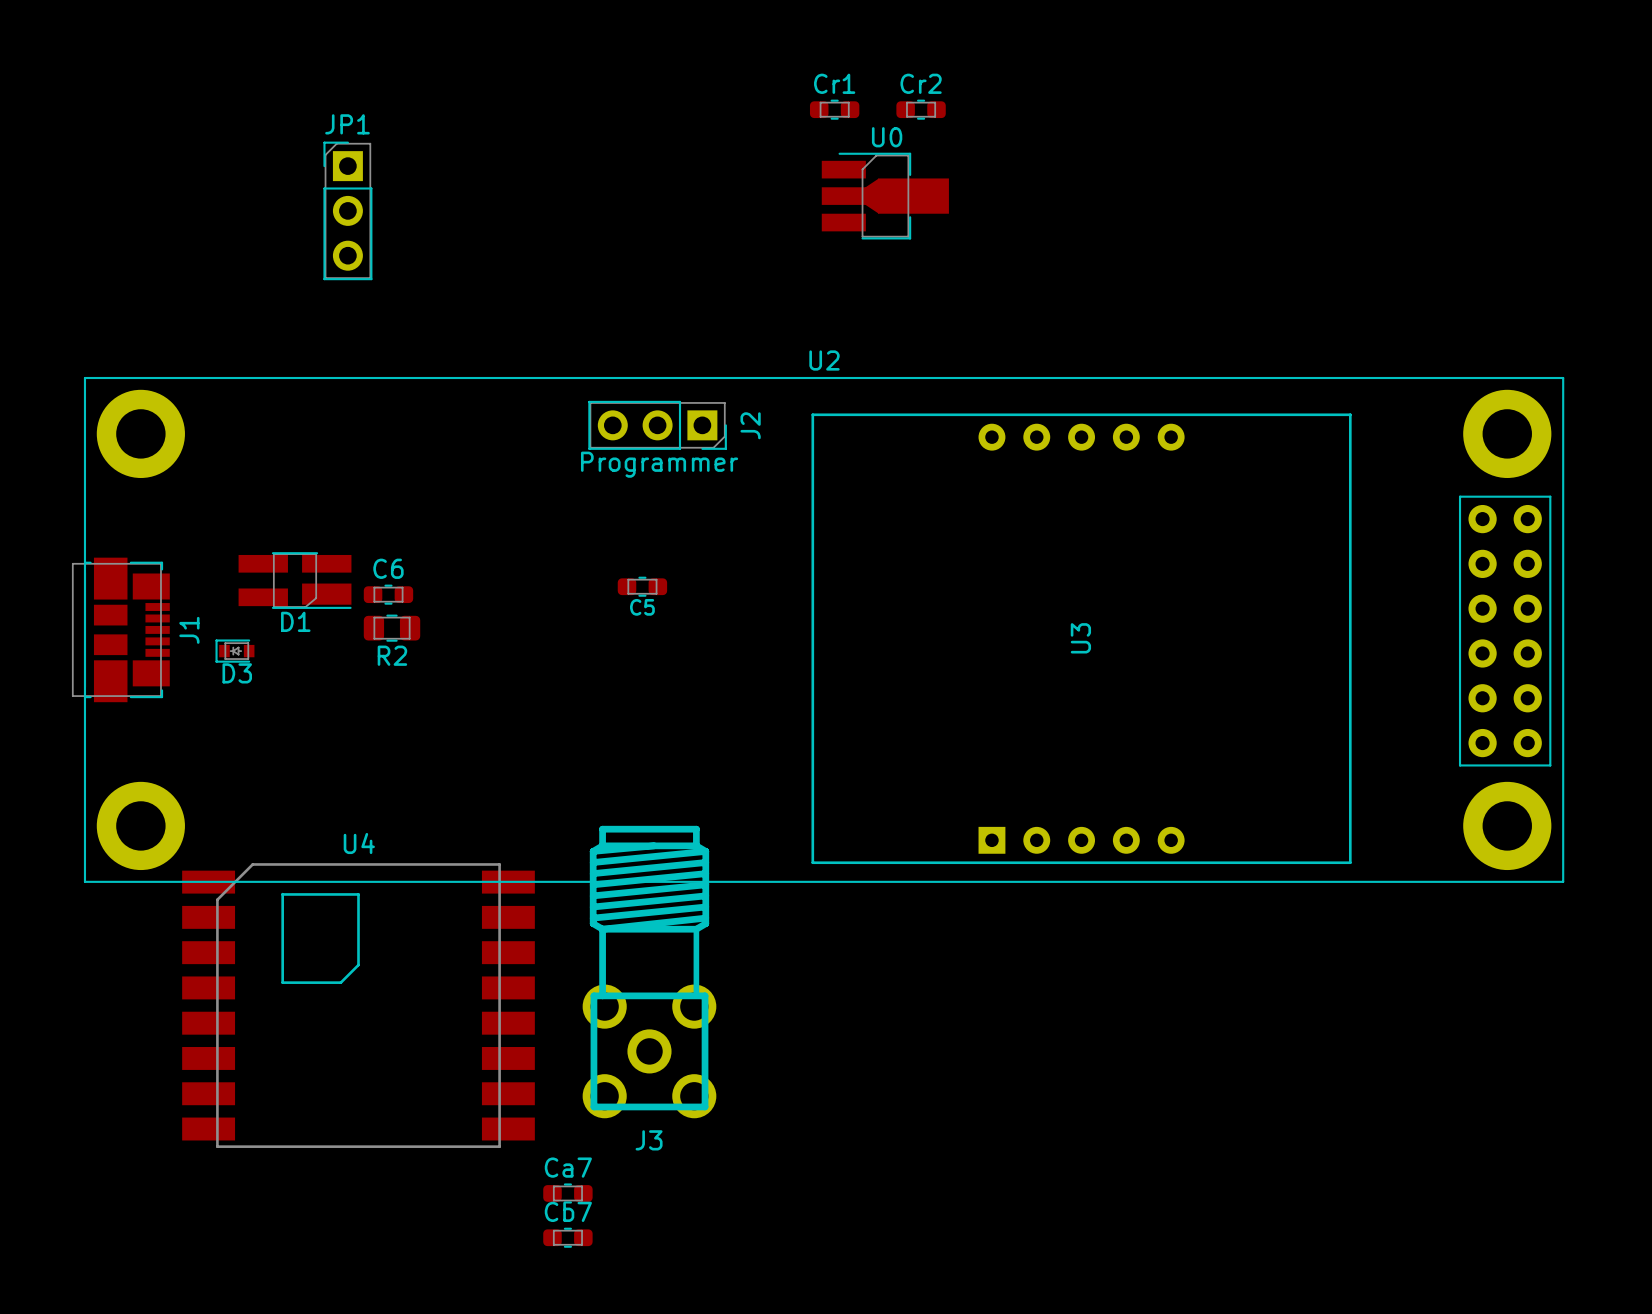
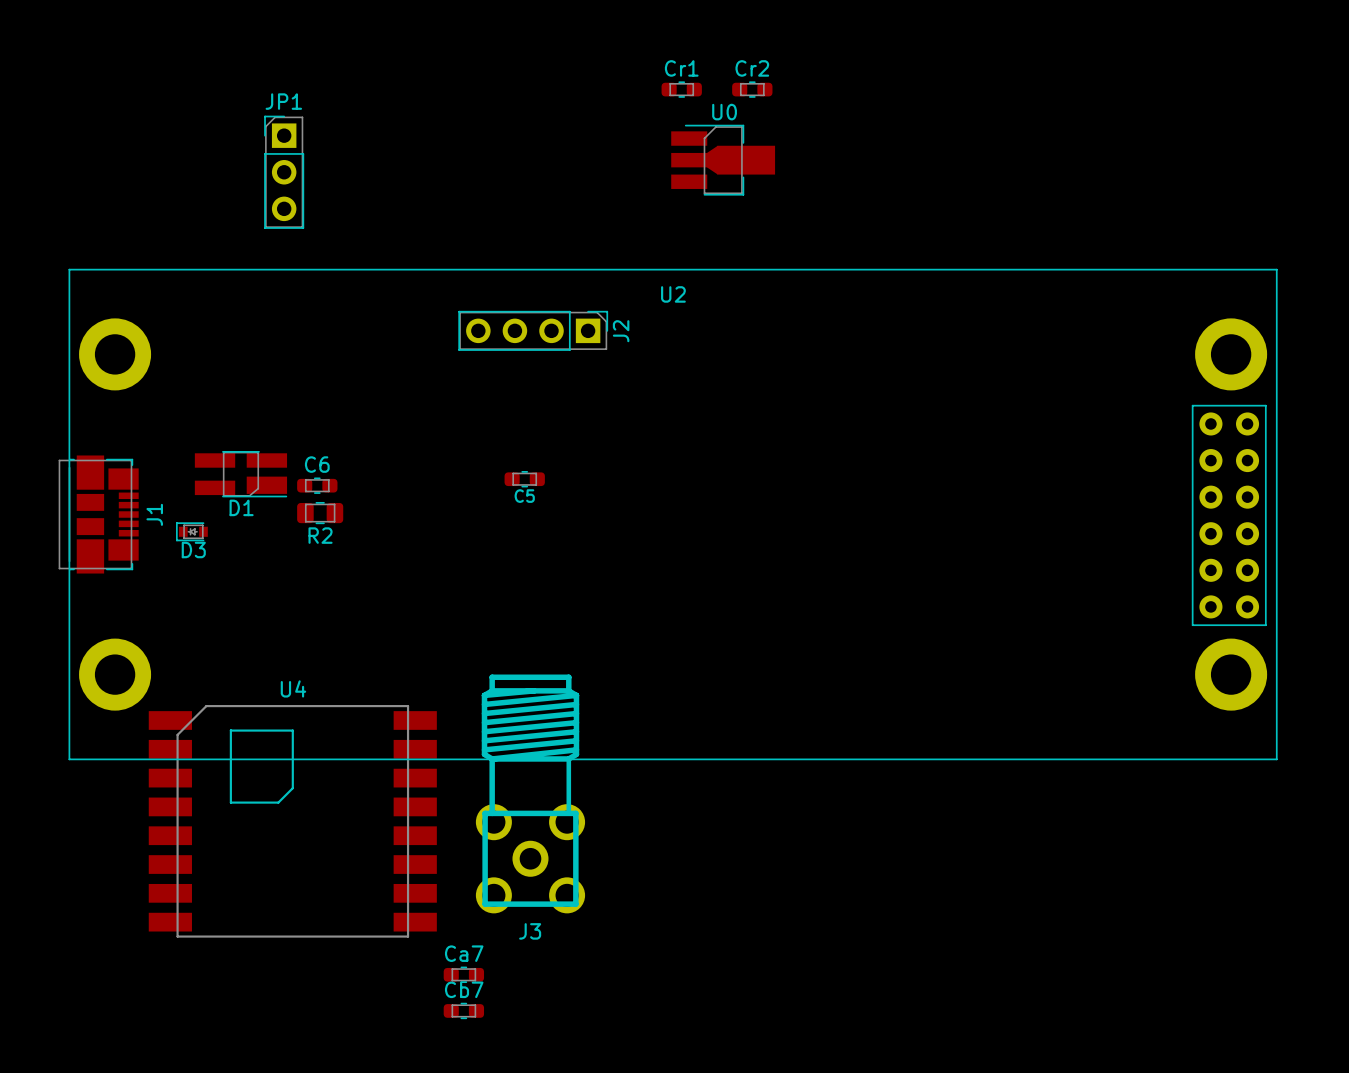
U2 footprint: [83, 376, 1565, 883] -> [68, 268, 1278, 761]
J2 footprint: [588, 400, 727, 450] -> [458, 310, 609, 351]
J2 value: Programmer (659, 464) -> none
U3: (1081, 638) -> none

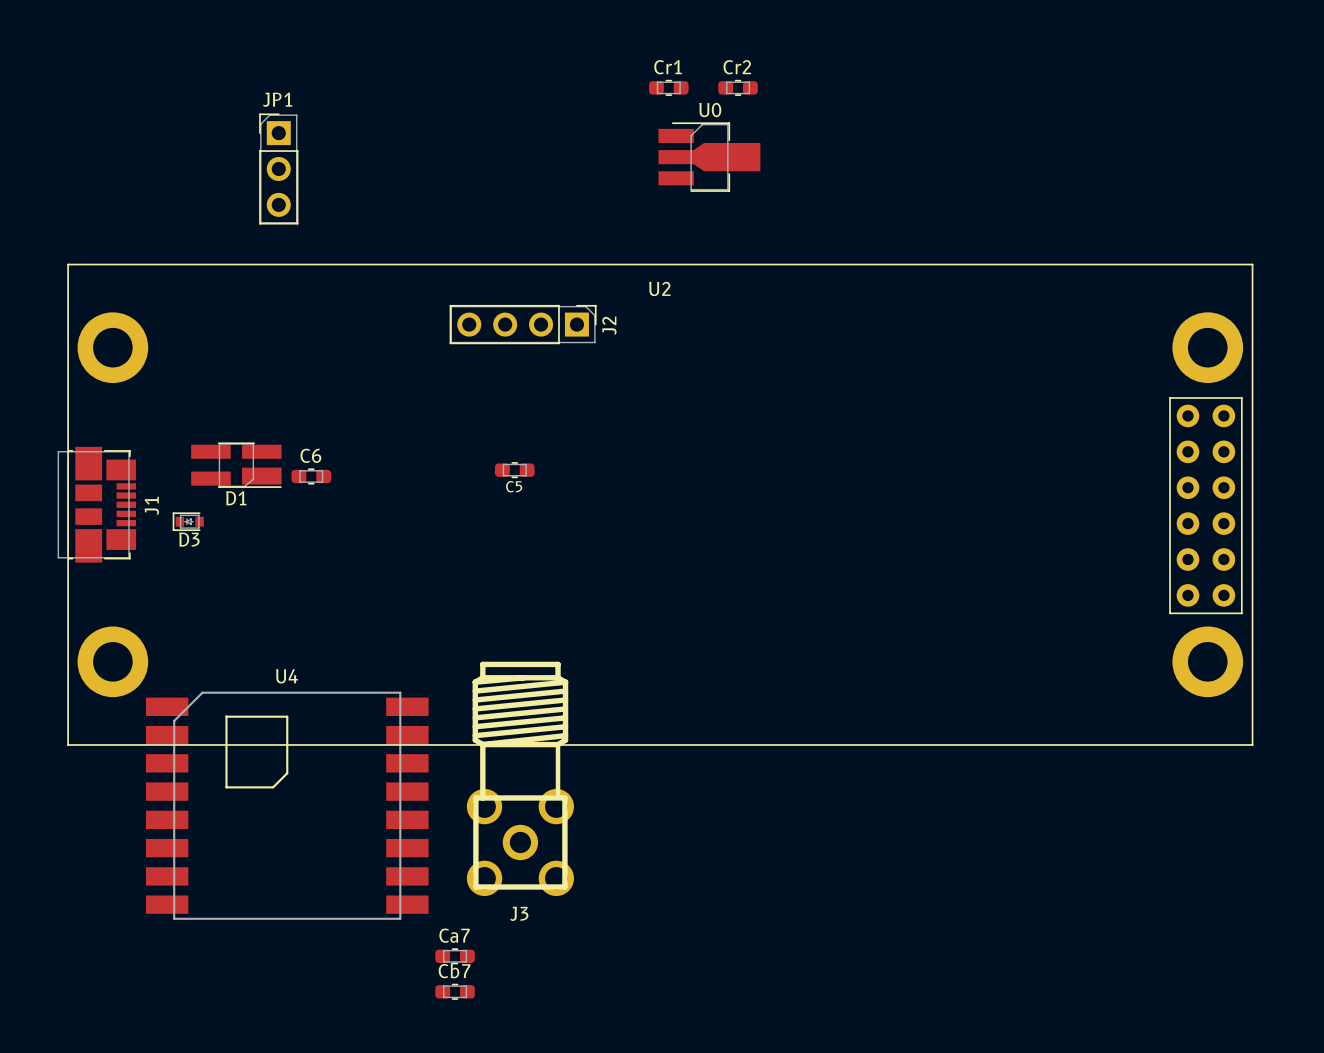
R2: (320, 513) -> none

